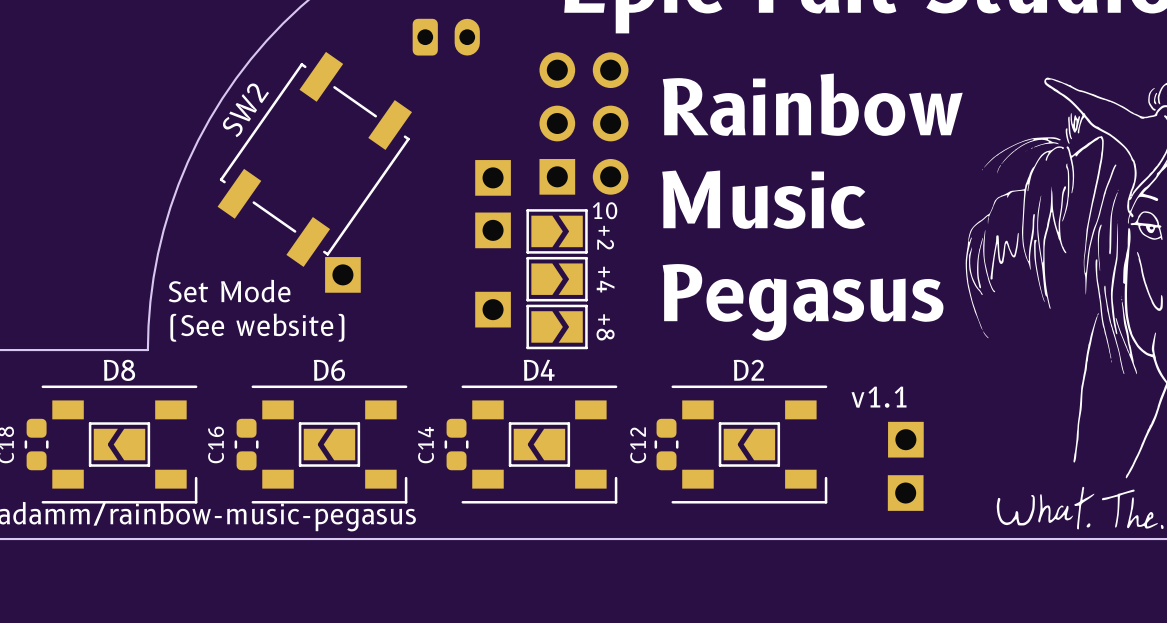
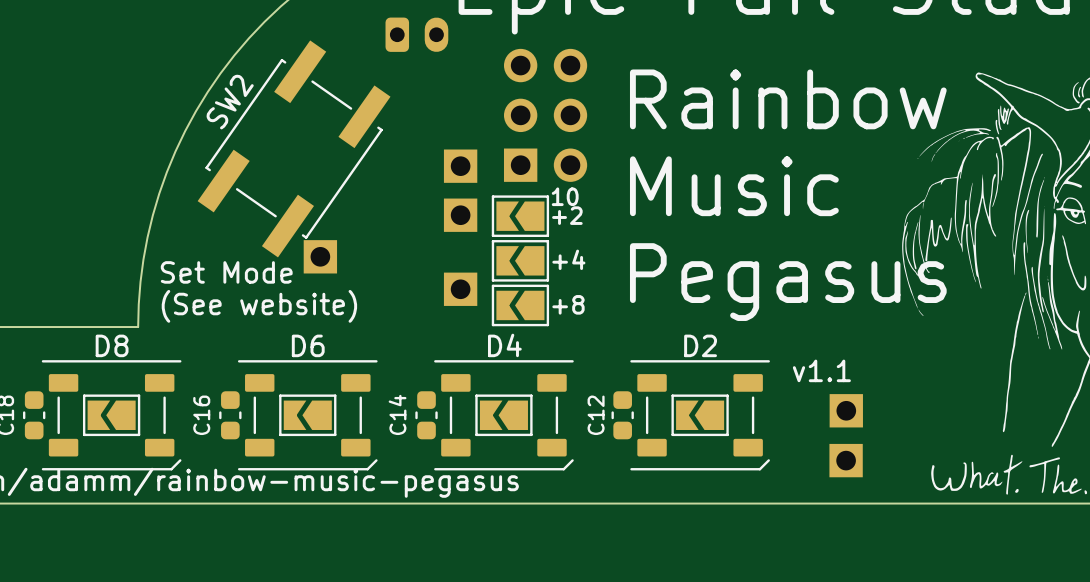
SW2 footprint: [217, 51, 412, 267] -> [197, 40, 391, 258]
part rotation: 0° (557, 231) -> 180° (520, 216)
text rotation: 0° (605, 237) -> 90° counterclockwise (567, 215)
part rotation: 0° (557, 279) -> 180° (520, 260)
text rotation: 0° (605, 279) -> 90° counterclockwise (568, 259)
part rotation: 0° (557, 326) -> 180° (520, 305)
text rotation: 0° (605, 327) -> 90° counterclockwise (568, 304)
D8 footprint: [41, 385, 198, 504] -> [41, 360, 182, 471]
D6 footprint: [251, 385, 408, 504] -> [237, 360, 378, 471]
D4 footprint: [461, 385, 618, 504] -> [434, 360, 574, 471]
D2 footprint: [671, 385, 828, 504] -> [630, 360, 770, 471]

